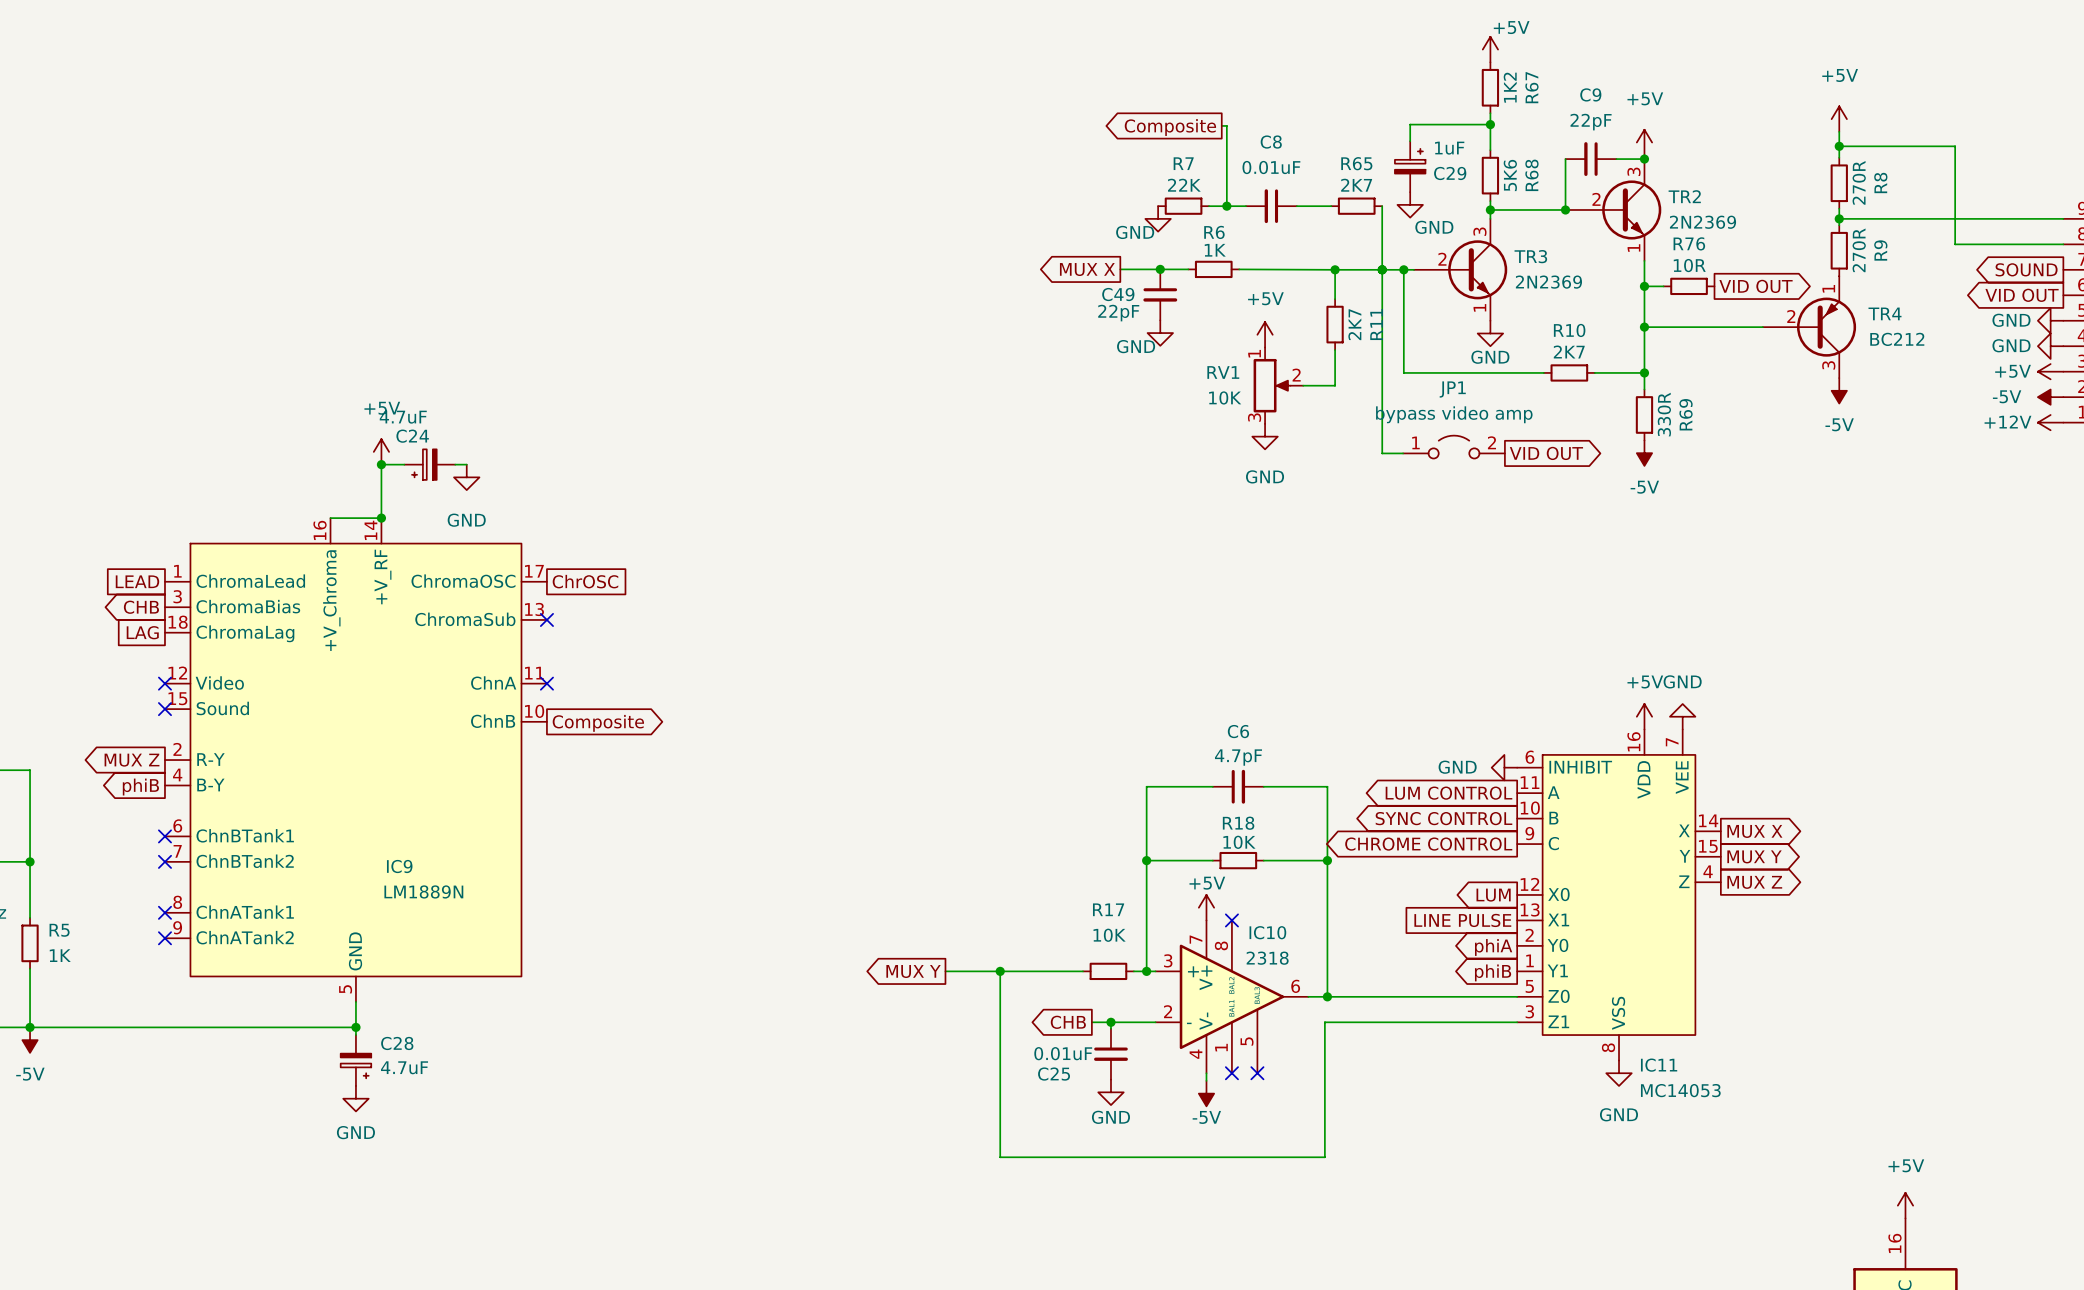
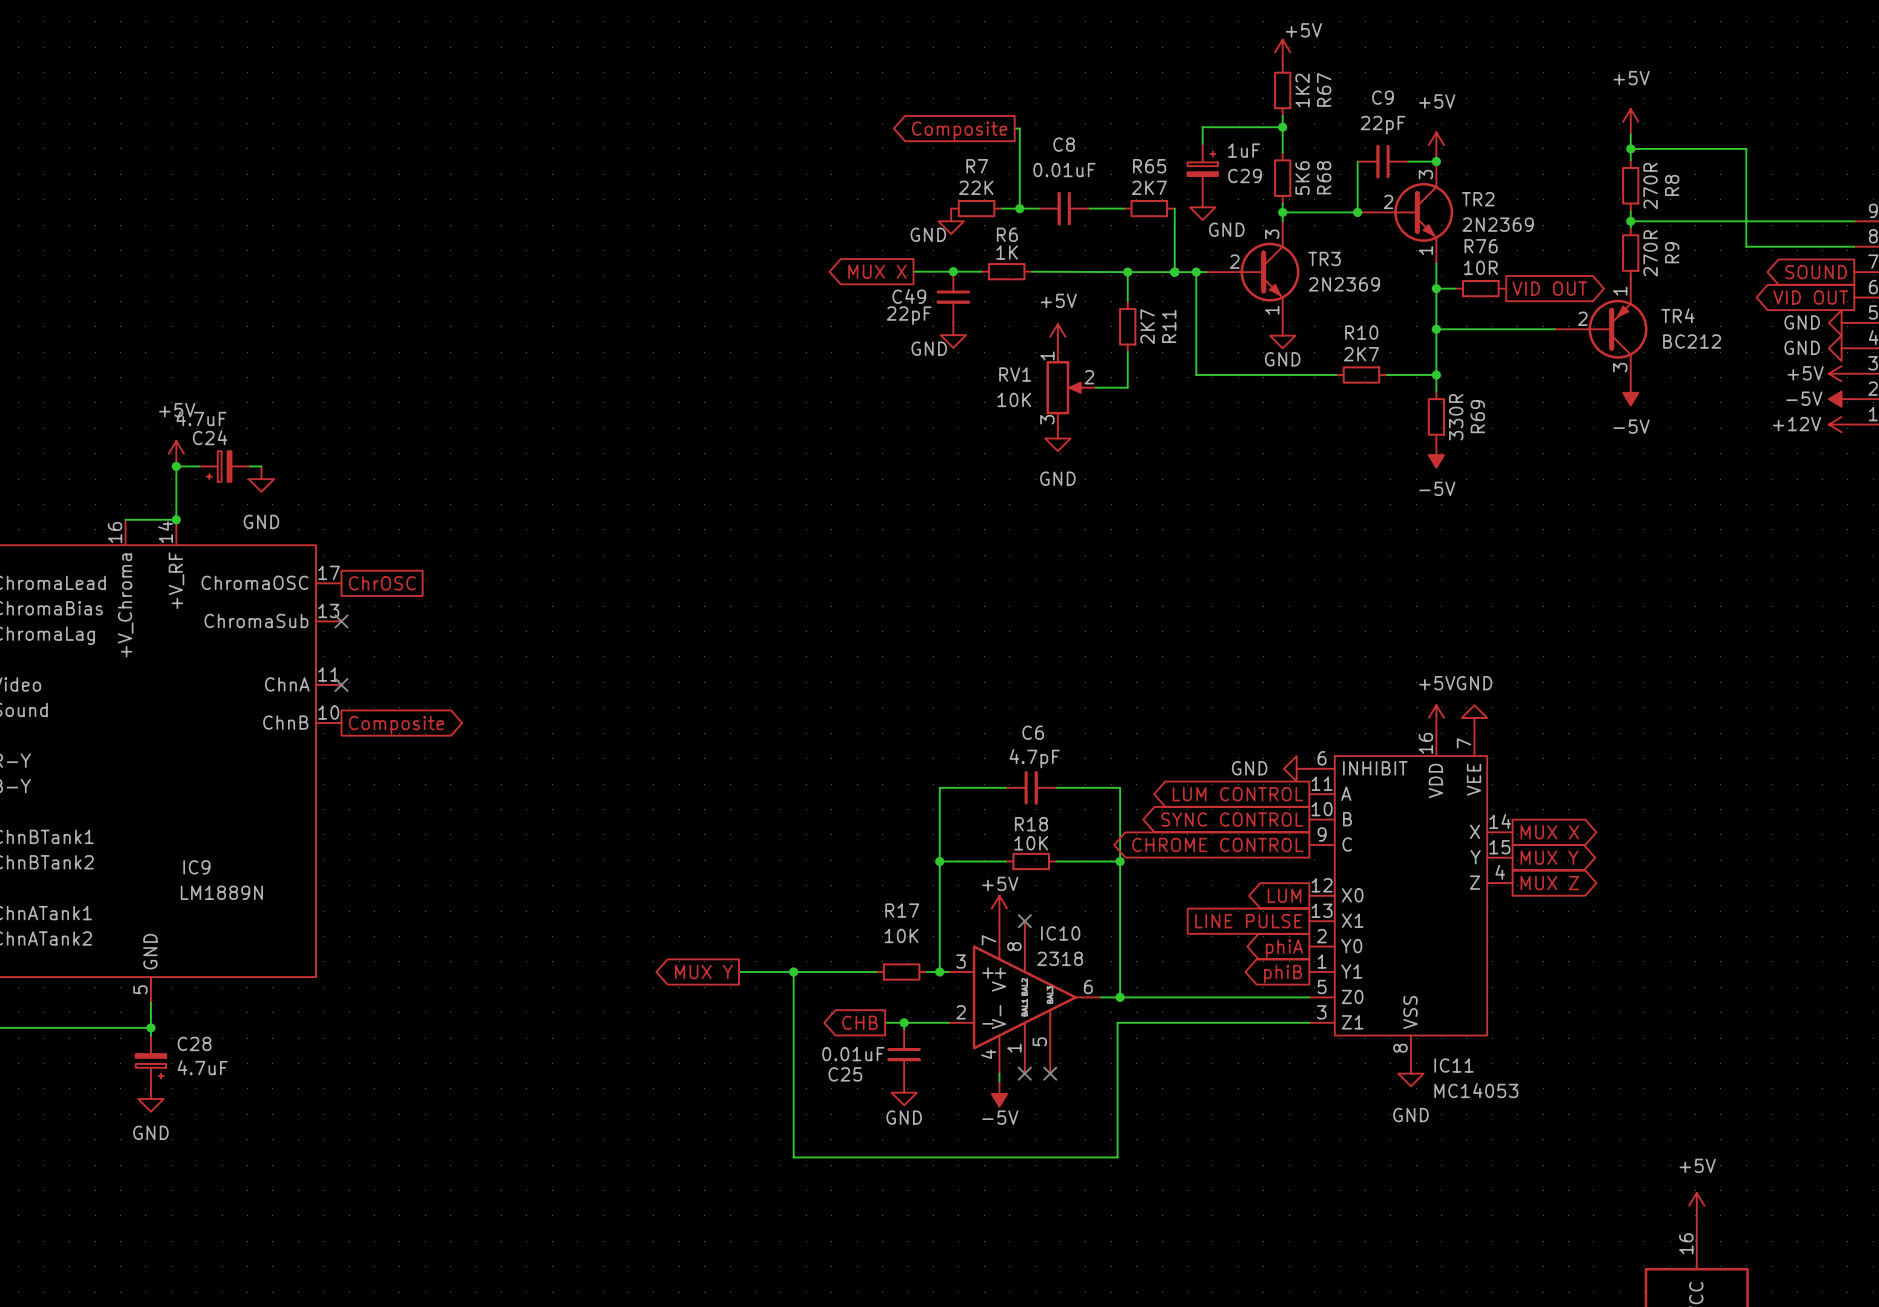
wire: (1382, 269) (1382, 453) (1403, 453) -> none
JP1: bypass video amp (1454, 447) -> none
global label: VID OUT (1546, 453) -> none

